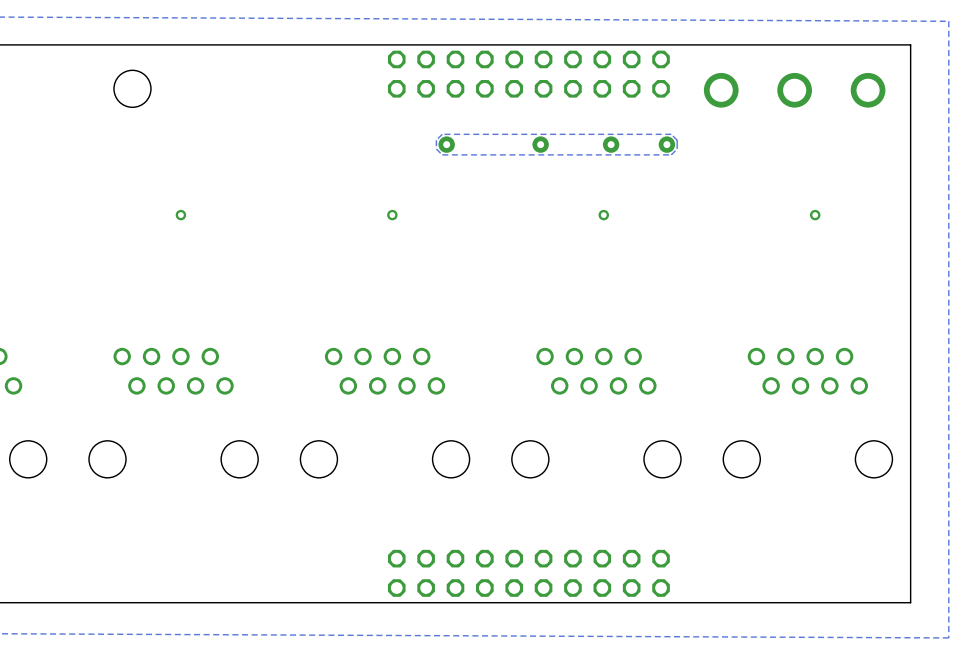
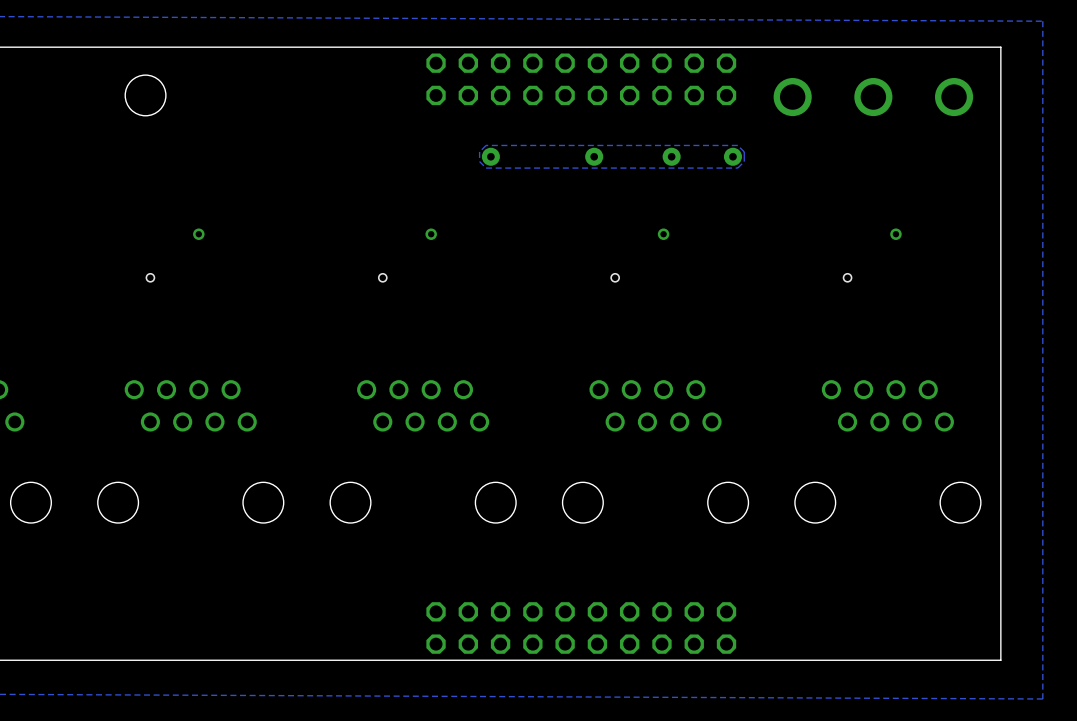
part: none -> (150, 277)
part: none -> (382, 277)
part: none -> (615, 277)
part: none -> (847, 277)

